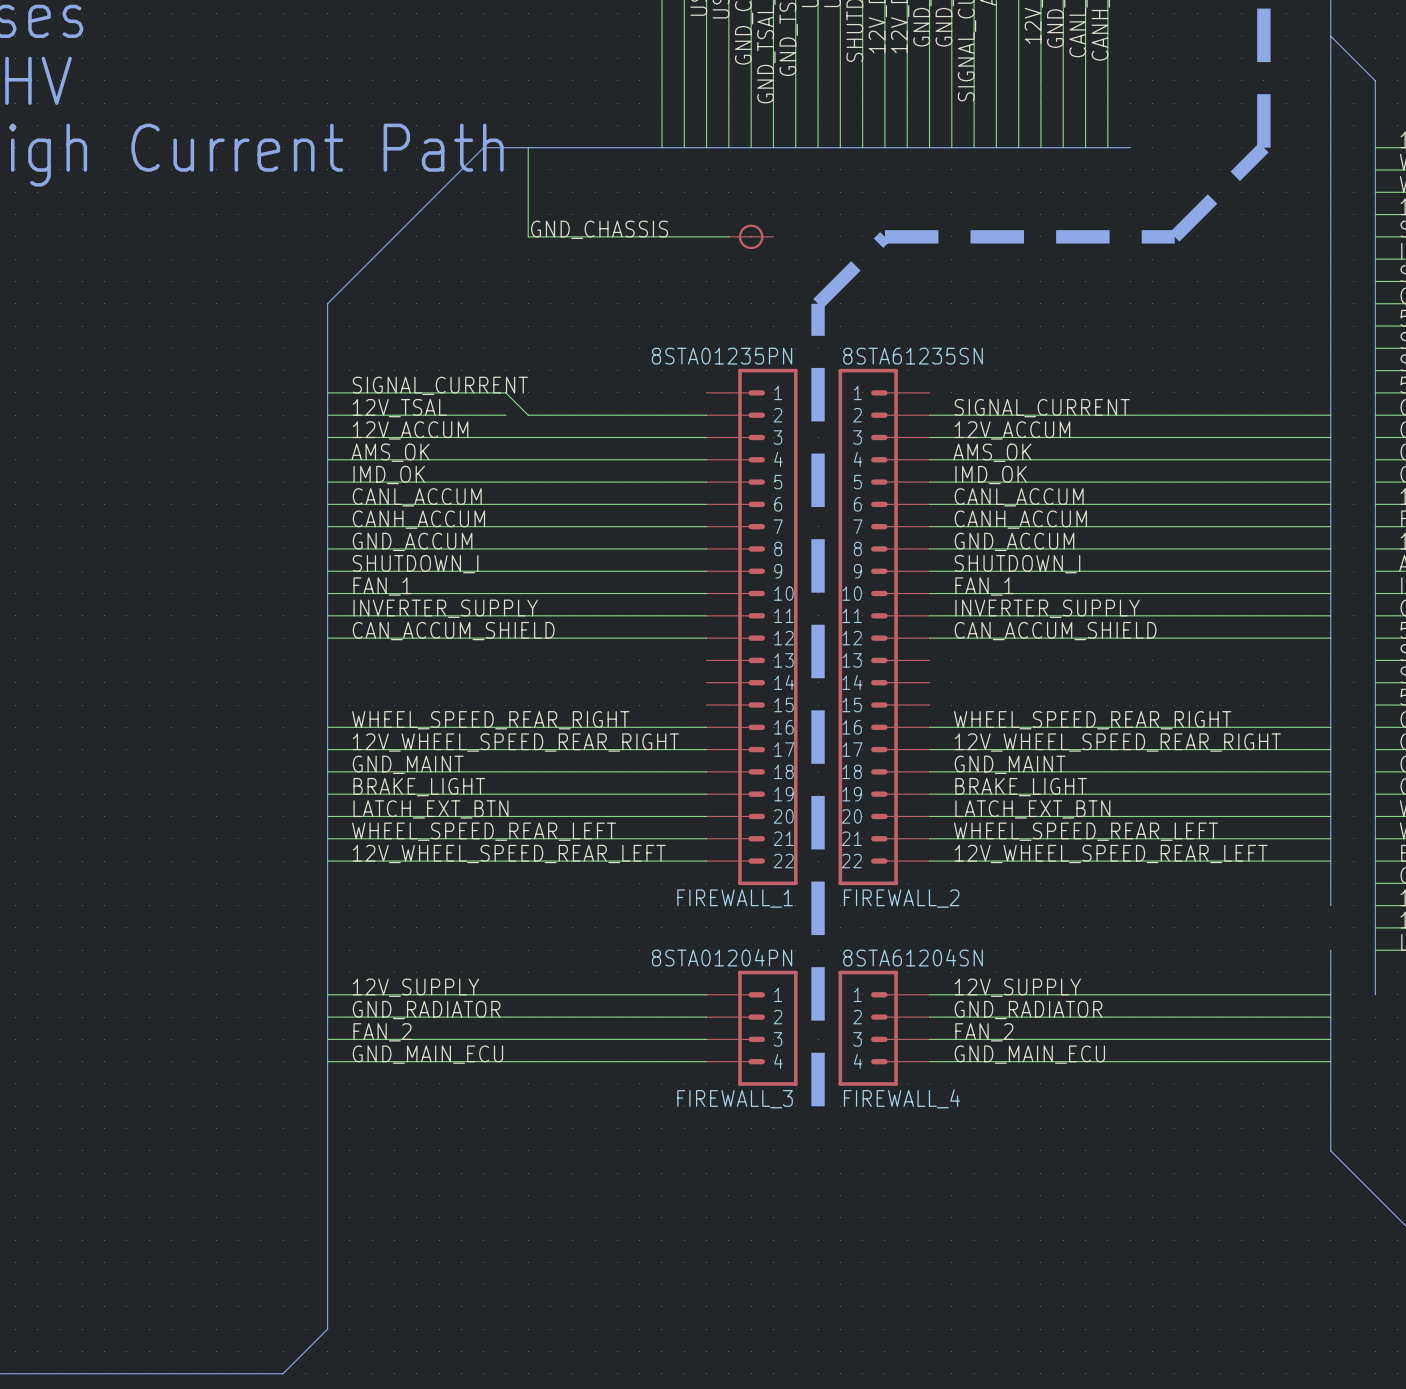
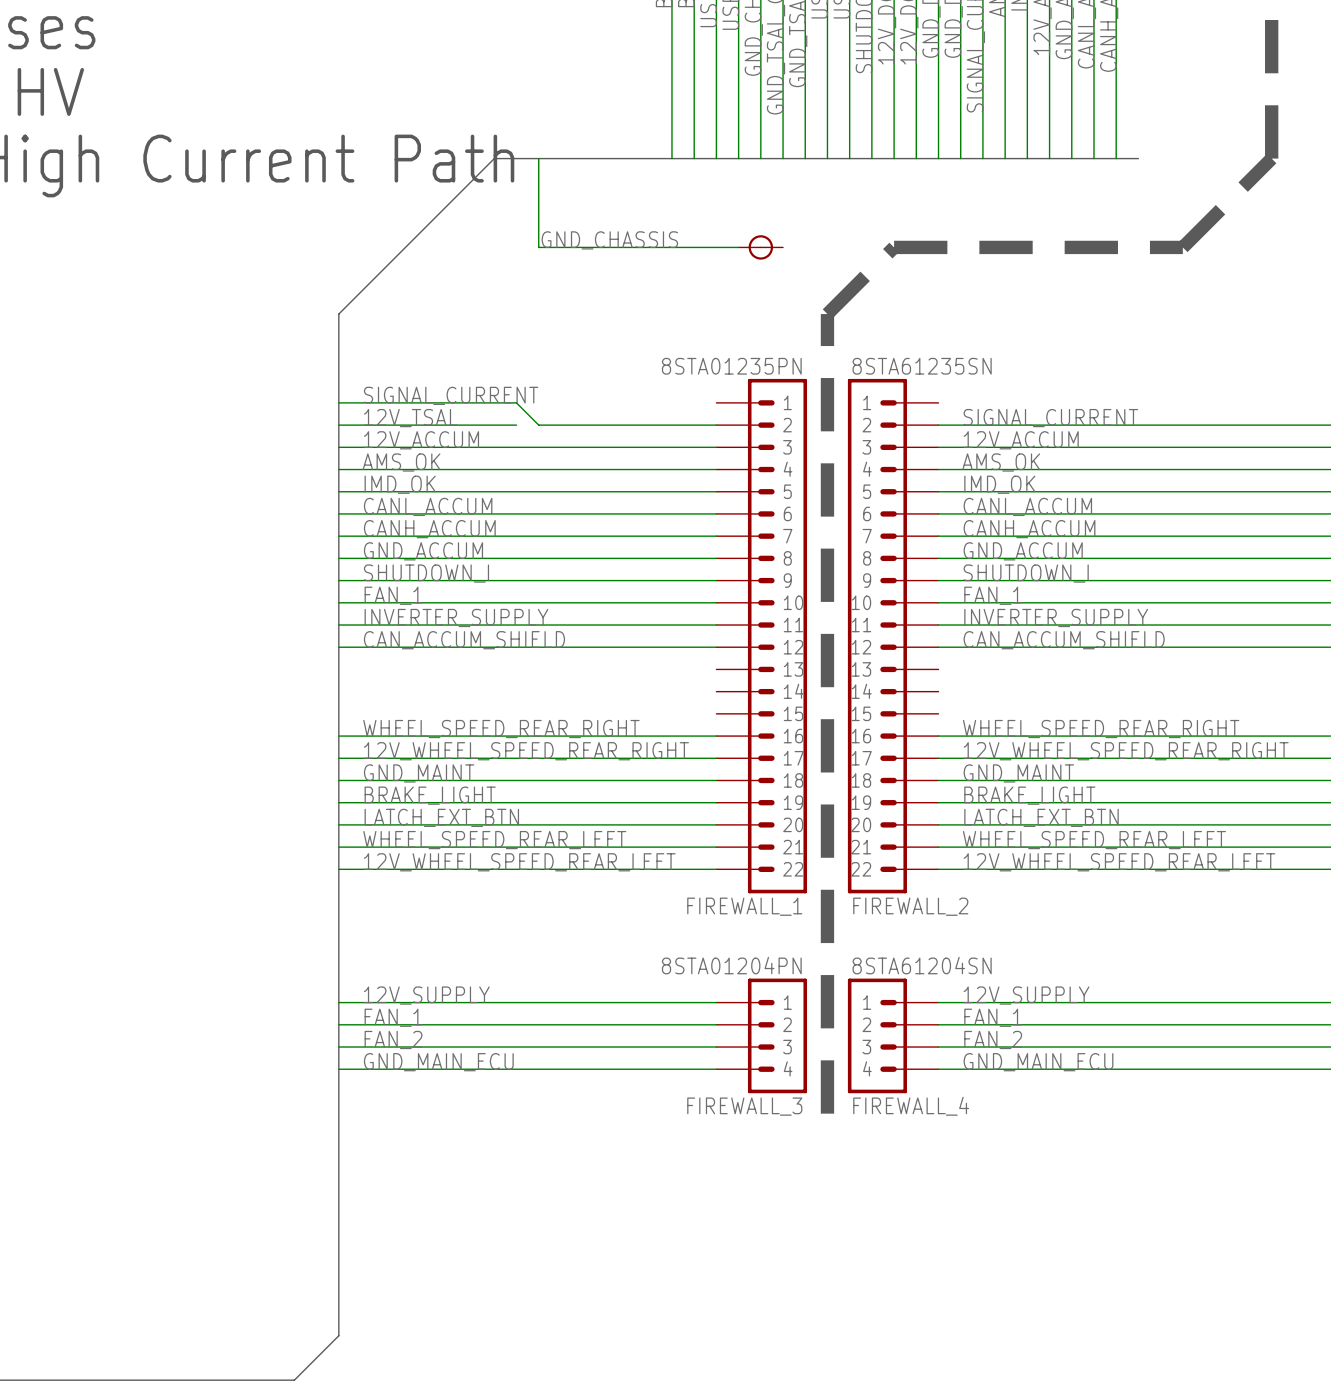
label: GND_RADIATOR (426, 1010) -> FAN_1 (393, 1017)
label: GND_RADIATOR (1028, 1010) -> FAN_1 (993, 1017)

